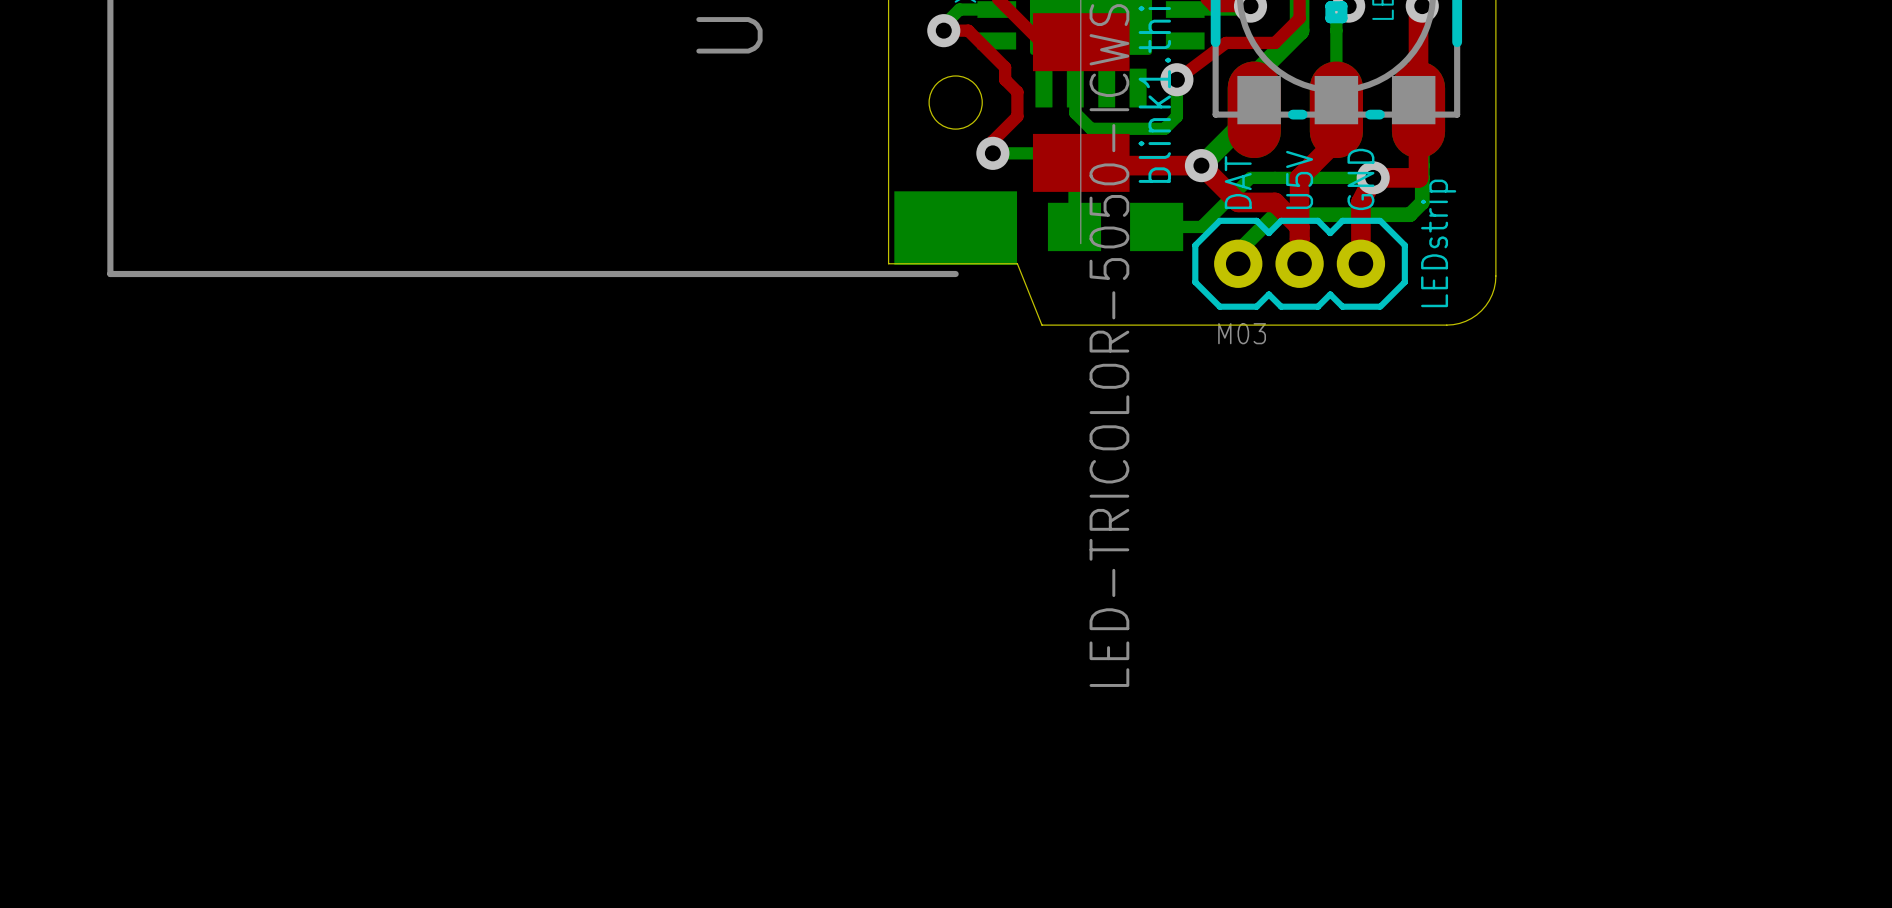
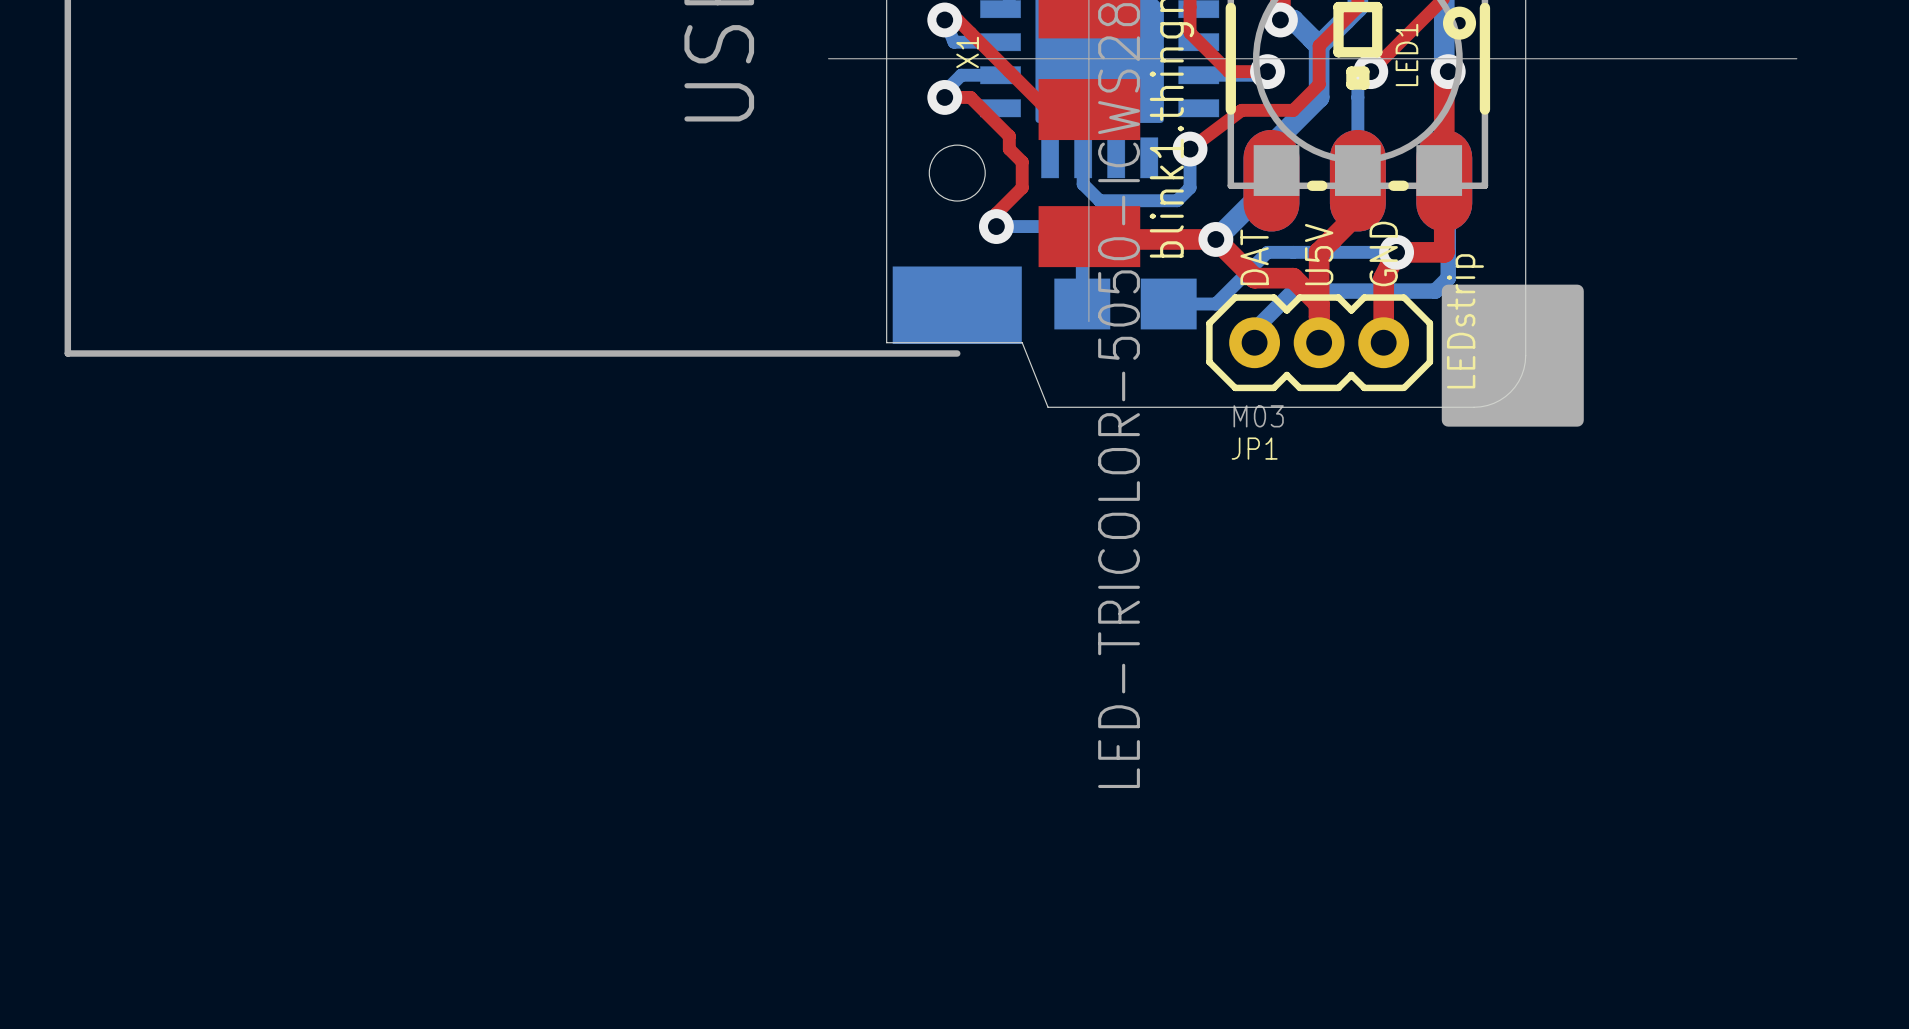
drawing: none -> [1441, 284, 1584, 427]
JP1 name: none -> JP1 (1254, 448)

